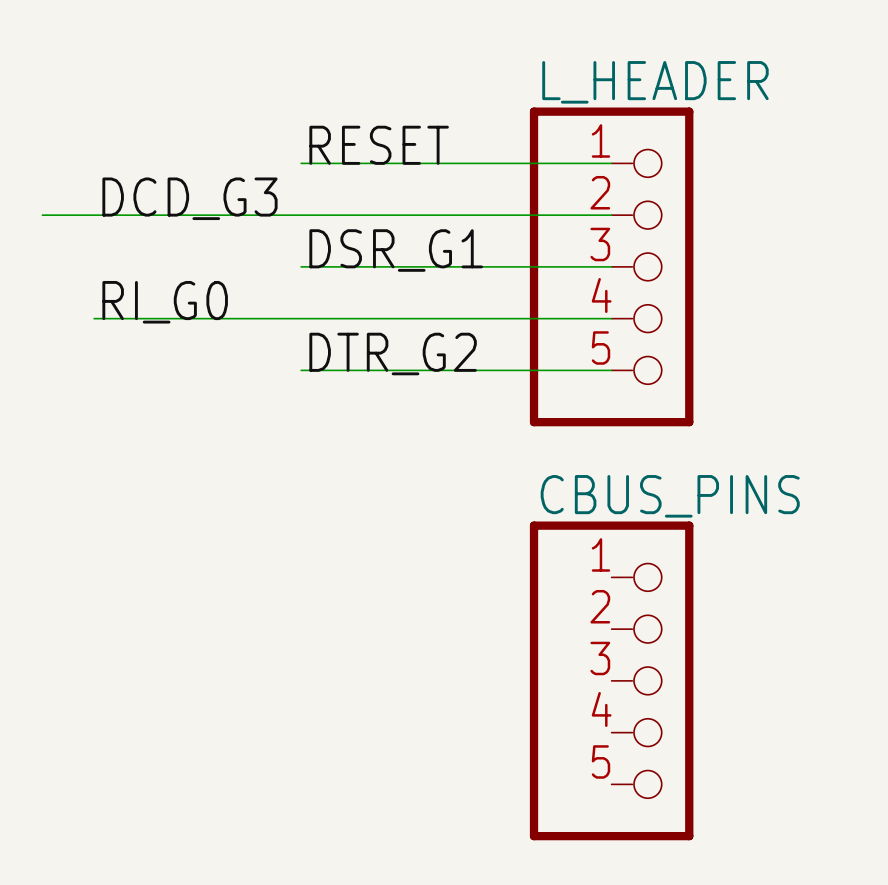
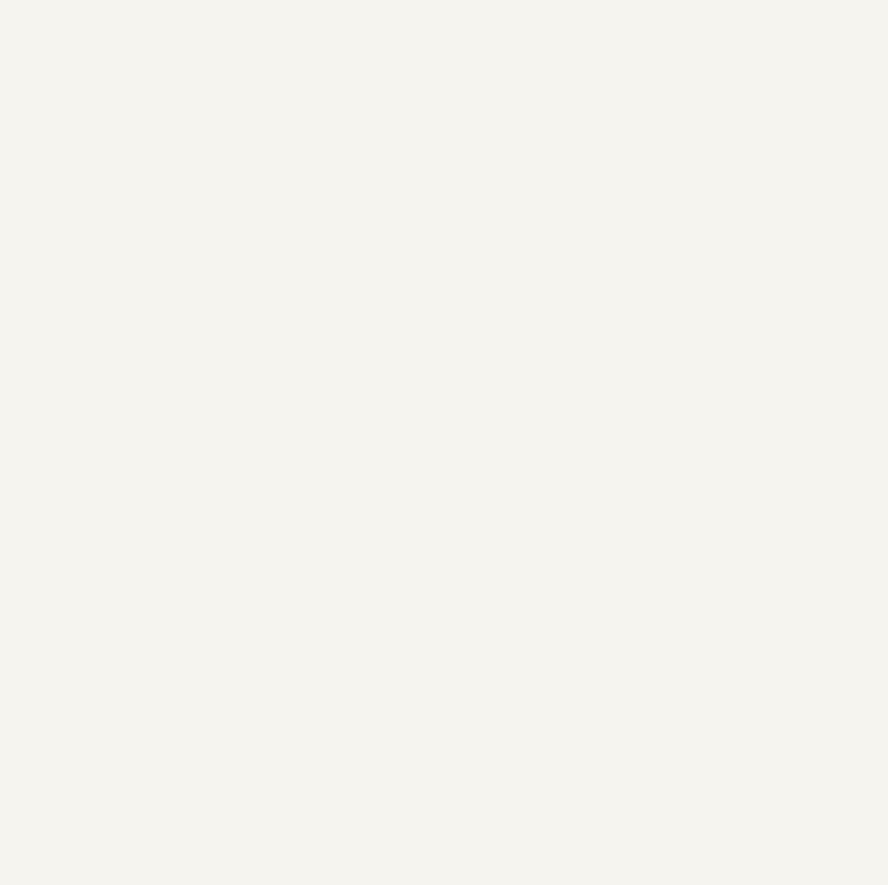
label: RESET (379, 145) -> none
wire: (301, 163) (611, 163) -> none
label: DCD_G3 (189, 198) -> none
wire: (42, 215) (611, 215) -> none
label: DSR_G1 (396, 250) -> none
wire: (301, 266) (611, 266) -> none
L_HEADER: (611, 266) -> none
label: RI_G0 (165, 302) -> none
wire: (94, 318) (611, 318) -> none
label: DTR_G2 (393, 354) -> none
wire: (301, 370) (611, 370) -> none
CBUS_PINS: (611, 680) -> none

